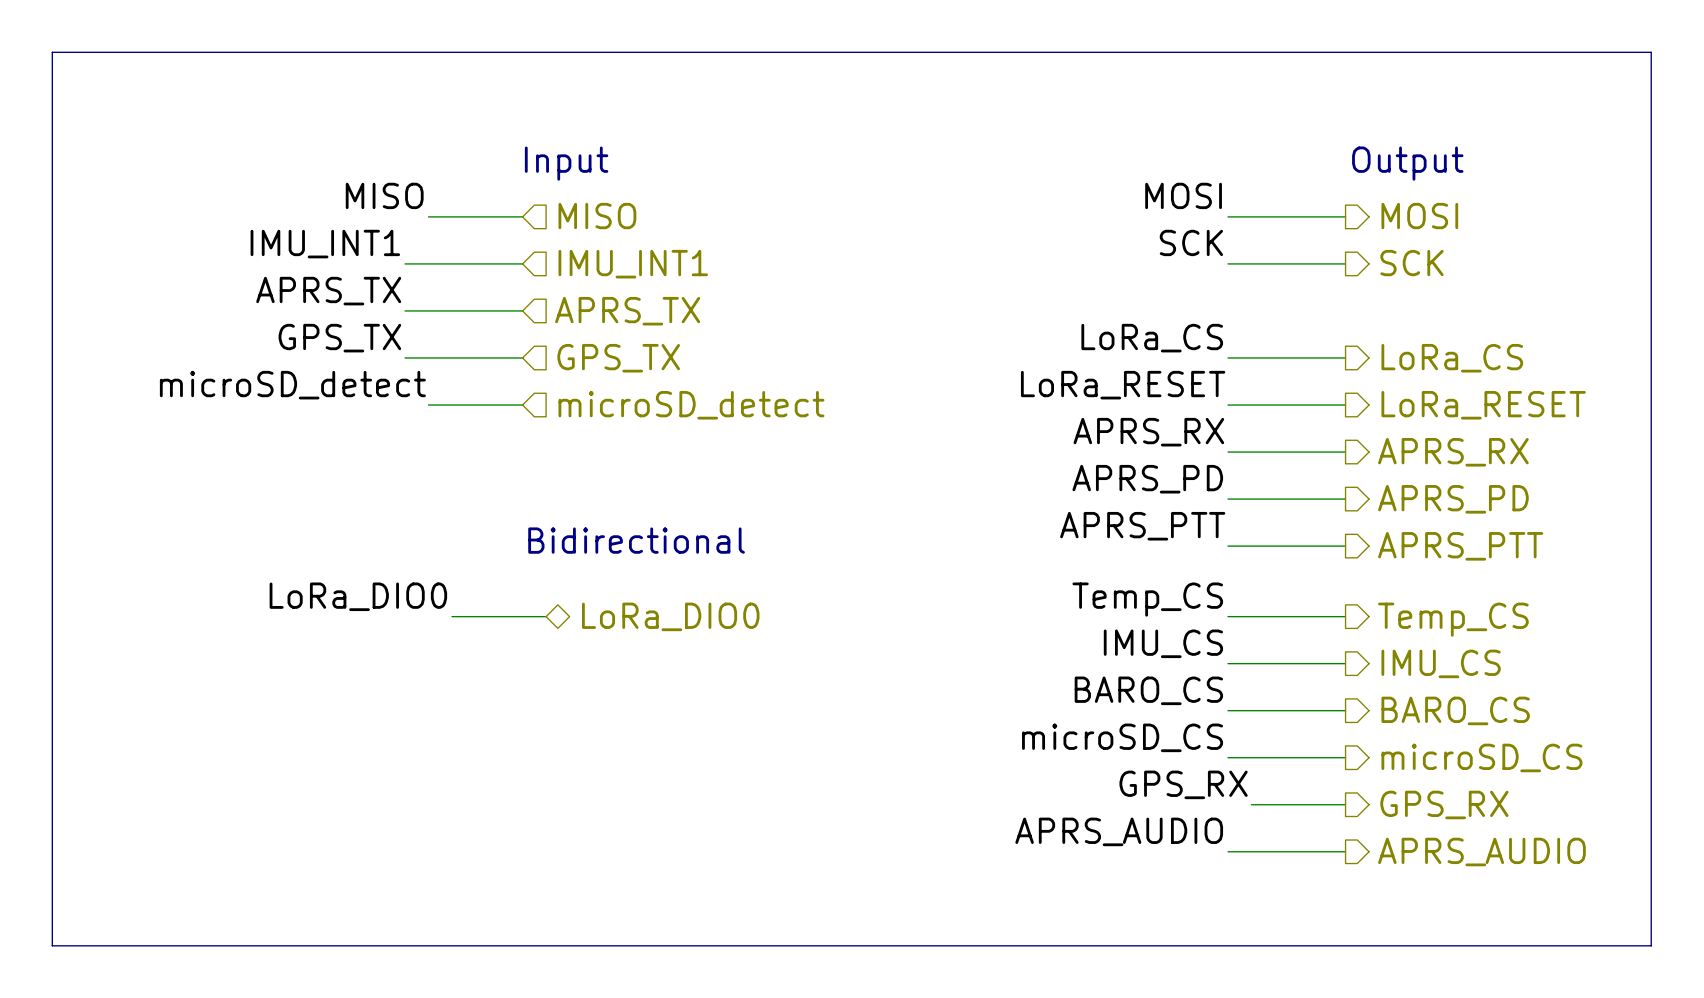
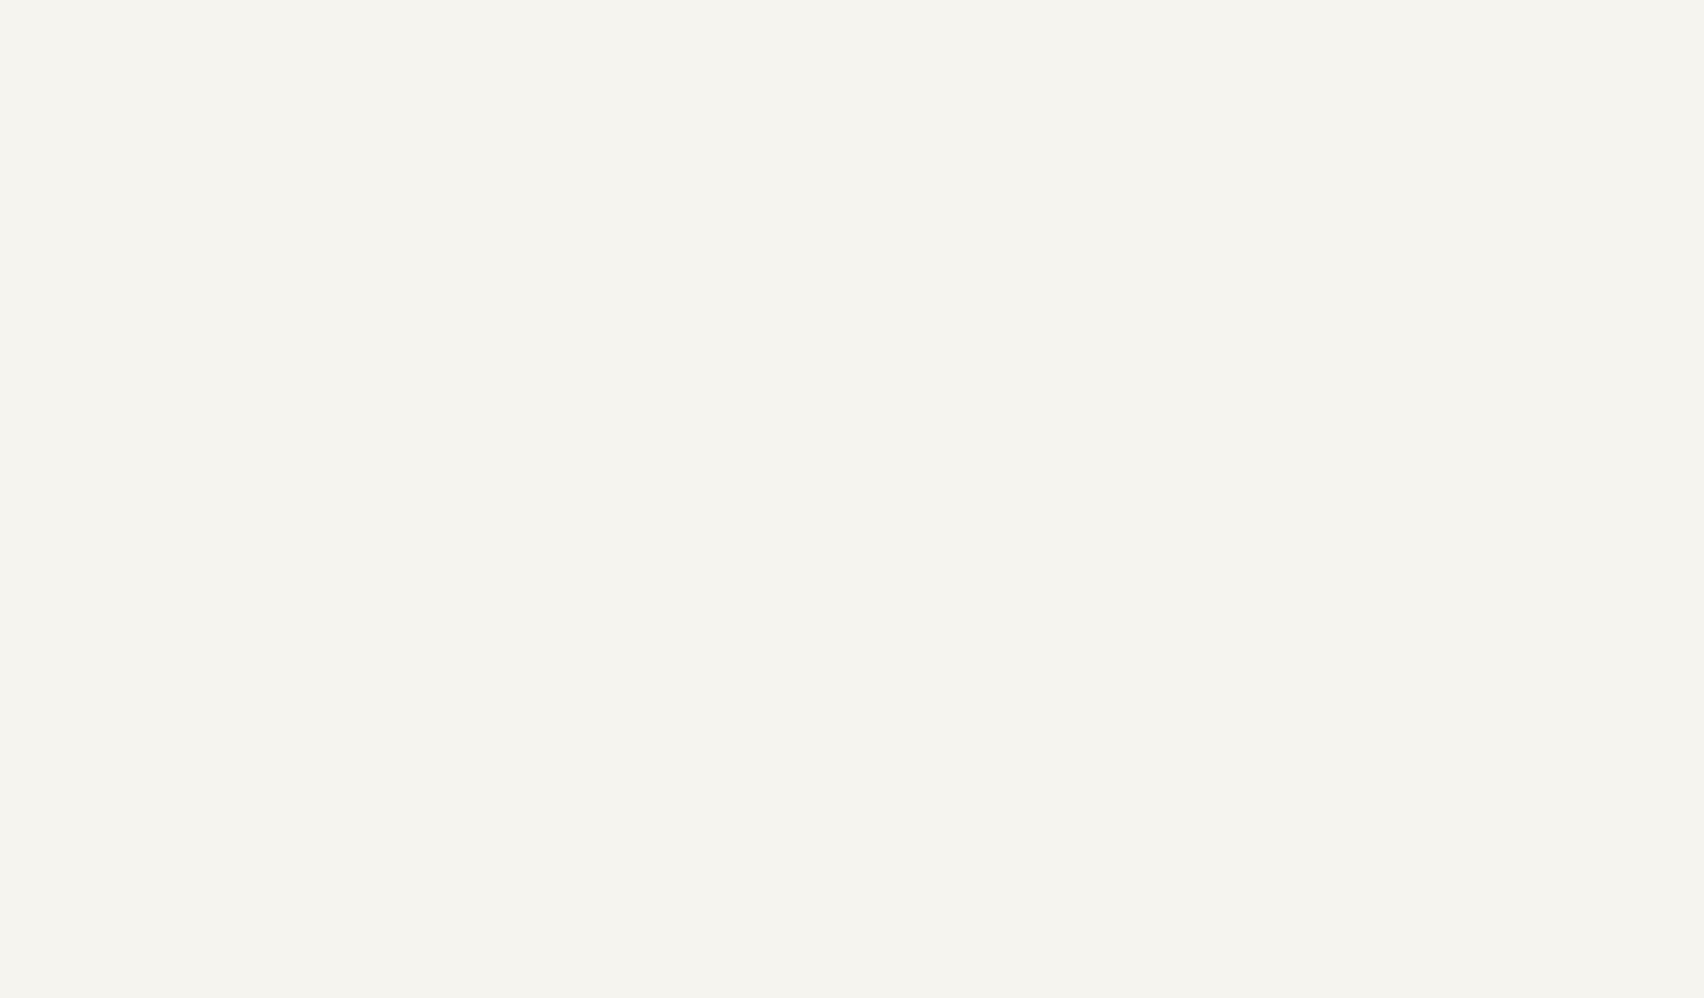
line: (52, 52) (1651, 52) (1651, 945) (52, 945) (52, 52) -> none
text: Input (566, 163) -> none
text: Output (1407, 163) -> none
label: MISO (384, 195) -> none
label: MOSI (1183, 195) -> none
wire: (428, 216) (522, 216) -> none
hierarchical label: MISO (597, 216) -> none
wire: (1227, 216) (1345, 216) -> none
hierarchical label: MOSI (1419, 216) -> none
label: SCK (1191, 242) -> none
label: IMU_INT1 (325, 244) -> none
wire: (405, 263) (522, 263) -> none
wire: (1227, 263) (1345, 263) -> none
hierarchical label: SCK (1411, 263) -> none
hierarchical label: IMU_INT1 (633, 264) -> none
label: APRS_TX (328, 291) -> none
wire: (405, 310) (522, 310) -> none
hierarchical label: APRS_TX (627, 311) -> none
label: GPS_TX (339, 338) -> none
label: LoRa_CS (1152, 338) -> none
wire: (405, 357) (522, 357) -> none
wire: (1227, 357) (1345, 357) -> none
hierarchical label: GPS_TX (618, 358) -> none
hierarchical label: LoRa_CS (1452, 358) -> none
label: microSD_detect (292, 385) -> none
label: LoRa_RESET (1123, 385) -> none
wire: (428, 405) (522, 405) -> none
hierarchical label: microSD_detect (691, 405) -> none
wire: (1227, 405) (1345, 405) -> none
hierarchical label: LoRa_RESET (1483, 405) -> none
label: APRS_RX (1148, 432) -> none
wire: (1227, 452) (1345, 452) -> none
hierarchical label: APRS_RX (1453, 452) -> none
label: APRS_PD (1147, 479) -> none
wire: (1227, 499) (1345, 499) -> none
hierarchical label: APRS_PD (1453, 499) -> none
label: APRS_PTT (1142, 526) -> none
text: Bidirectional (636, 540) -> none
wire: (1227, 546) (1345, 546) -> none
hierarchical label: APRS_PTT (1460, 546) -> none
label: LoRa_DIO0 (358, 596) -> none
label: Temp_CS (1147, 599) -> none
wire: (452, 616) (546, 616) -> none
hierarchical label: LoRa_DIO0 (670, 616) -> none
wire: (1227, 616) (1345, 616) -> none
hierarchical label: Temp_CS (1453, 619) -> none
label: IMU_CS (1163, 643) -> none
wire: (1227, 663) (1345, 663) -> none
hierarchical label: IMU_CS (1441, 663) -> none
label: BARO_CS (1148, 690) -> none
wire: (1227, 710) (1345, 710) -> none
hierarchical label: BARO_CS (1455, 710) -> none
label: microSD_CS (1122, 737) -> none
wire: (1227, 757) (1345, 757) -> none
hierarchical label: microSD_CS (1481, 757) -> none
label: GPS_RX (1183, 784) -> none
wire: (1251, 804) (1345, 804) -> none
hierarchical label: GPS_RX (1444, 804) -> none
label: APRS_AUDIO (1119, 831) -> none
wire: (1227, 851) (1345, 851) -> none
hierarchical label: APRS_AUDIO (1481, 852) -> none

